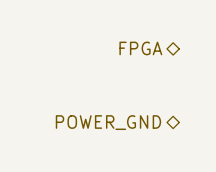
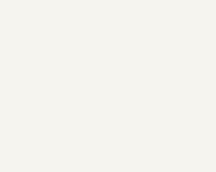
hierarchical label: FPGA (140, 48) -> none
hierarchical label: POWER_GND (108, 122) -> none

